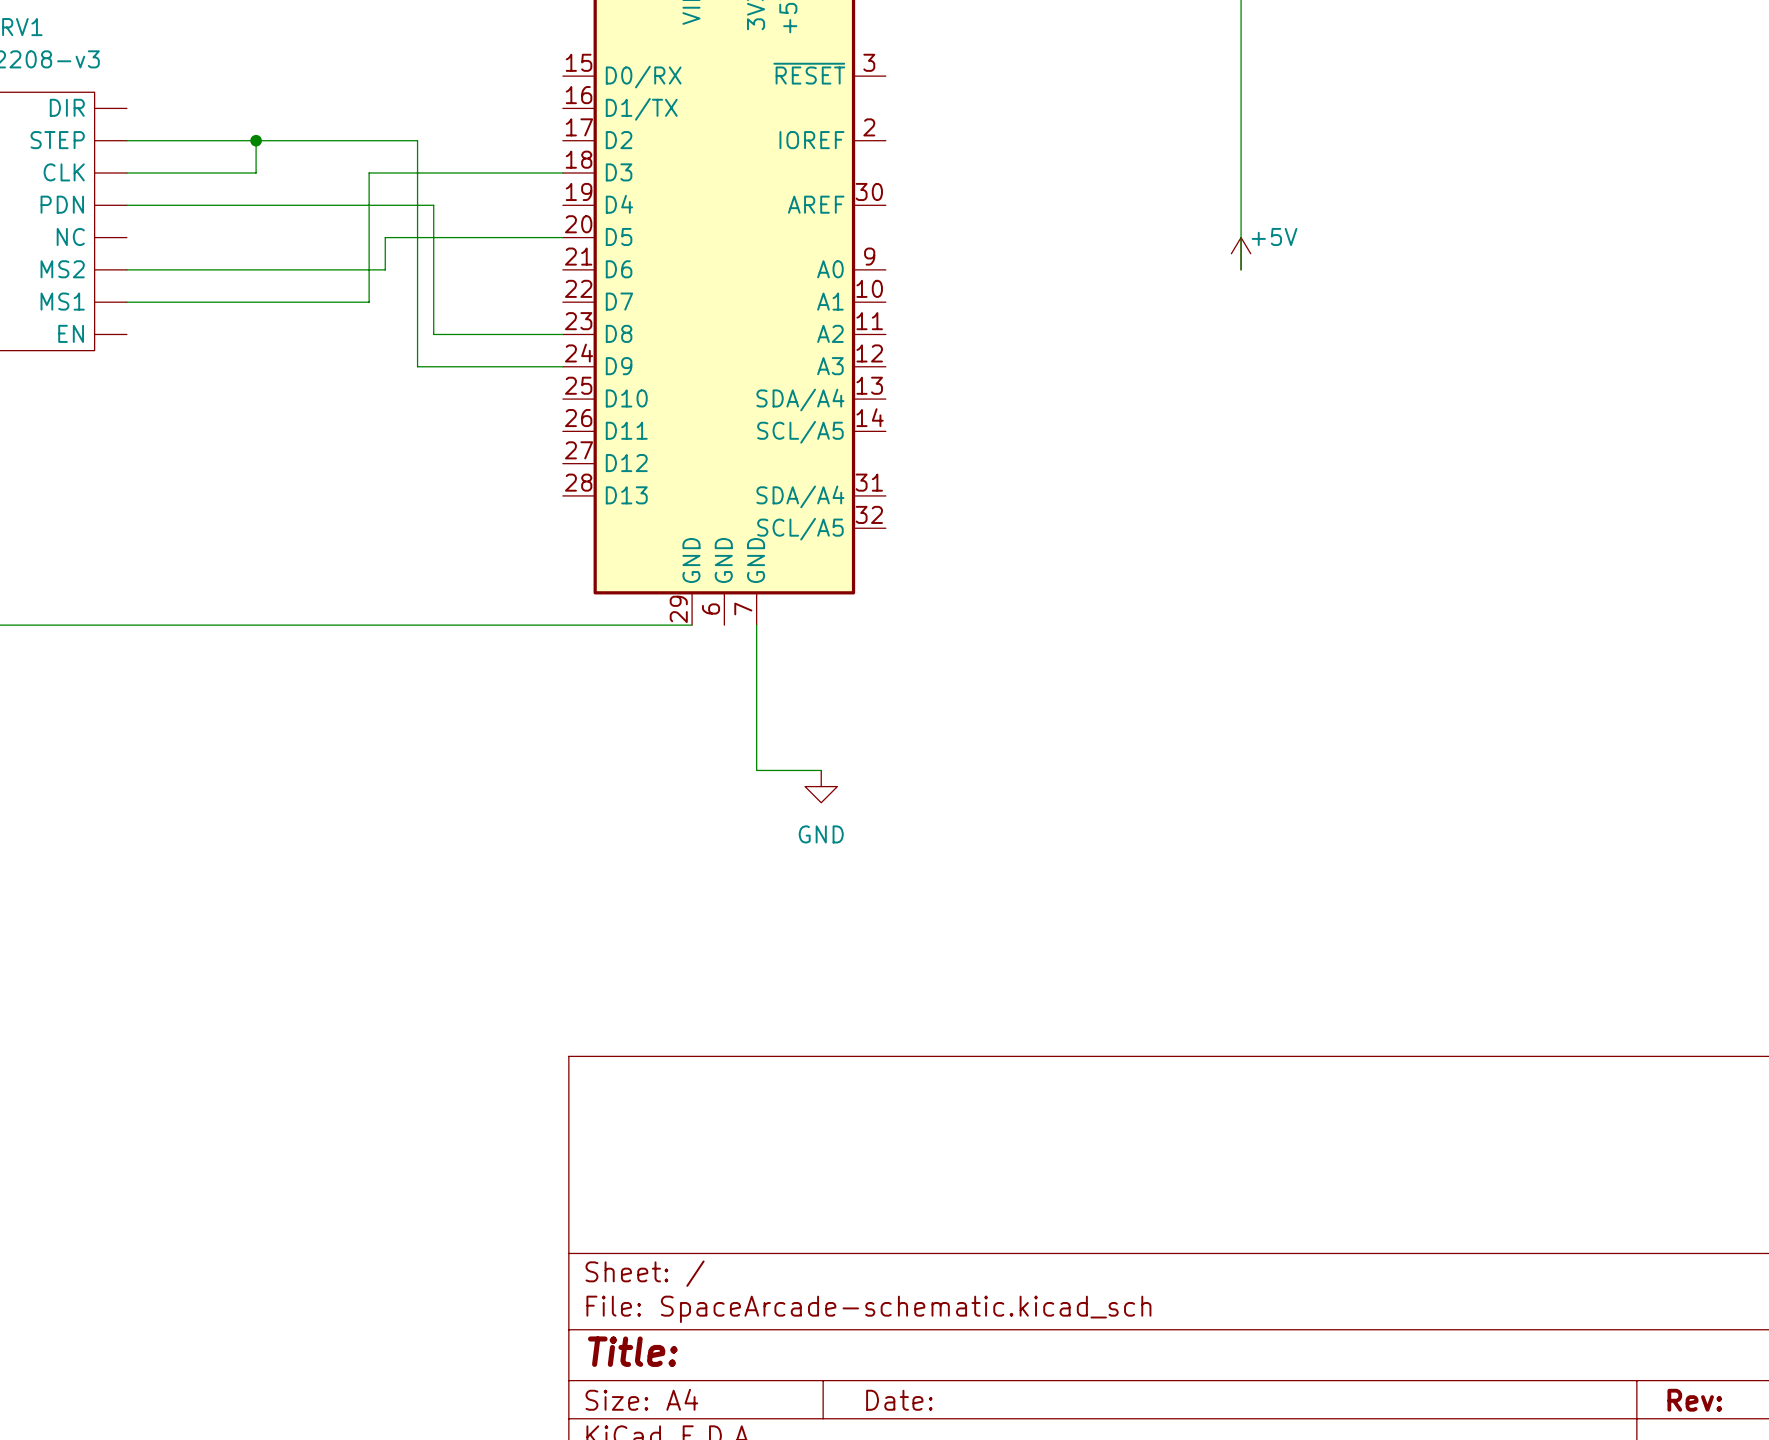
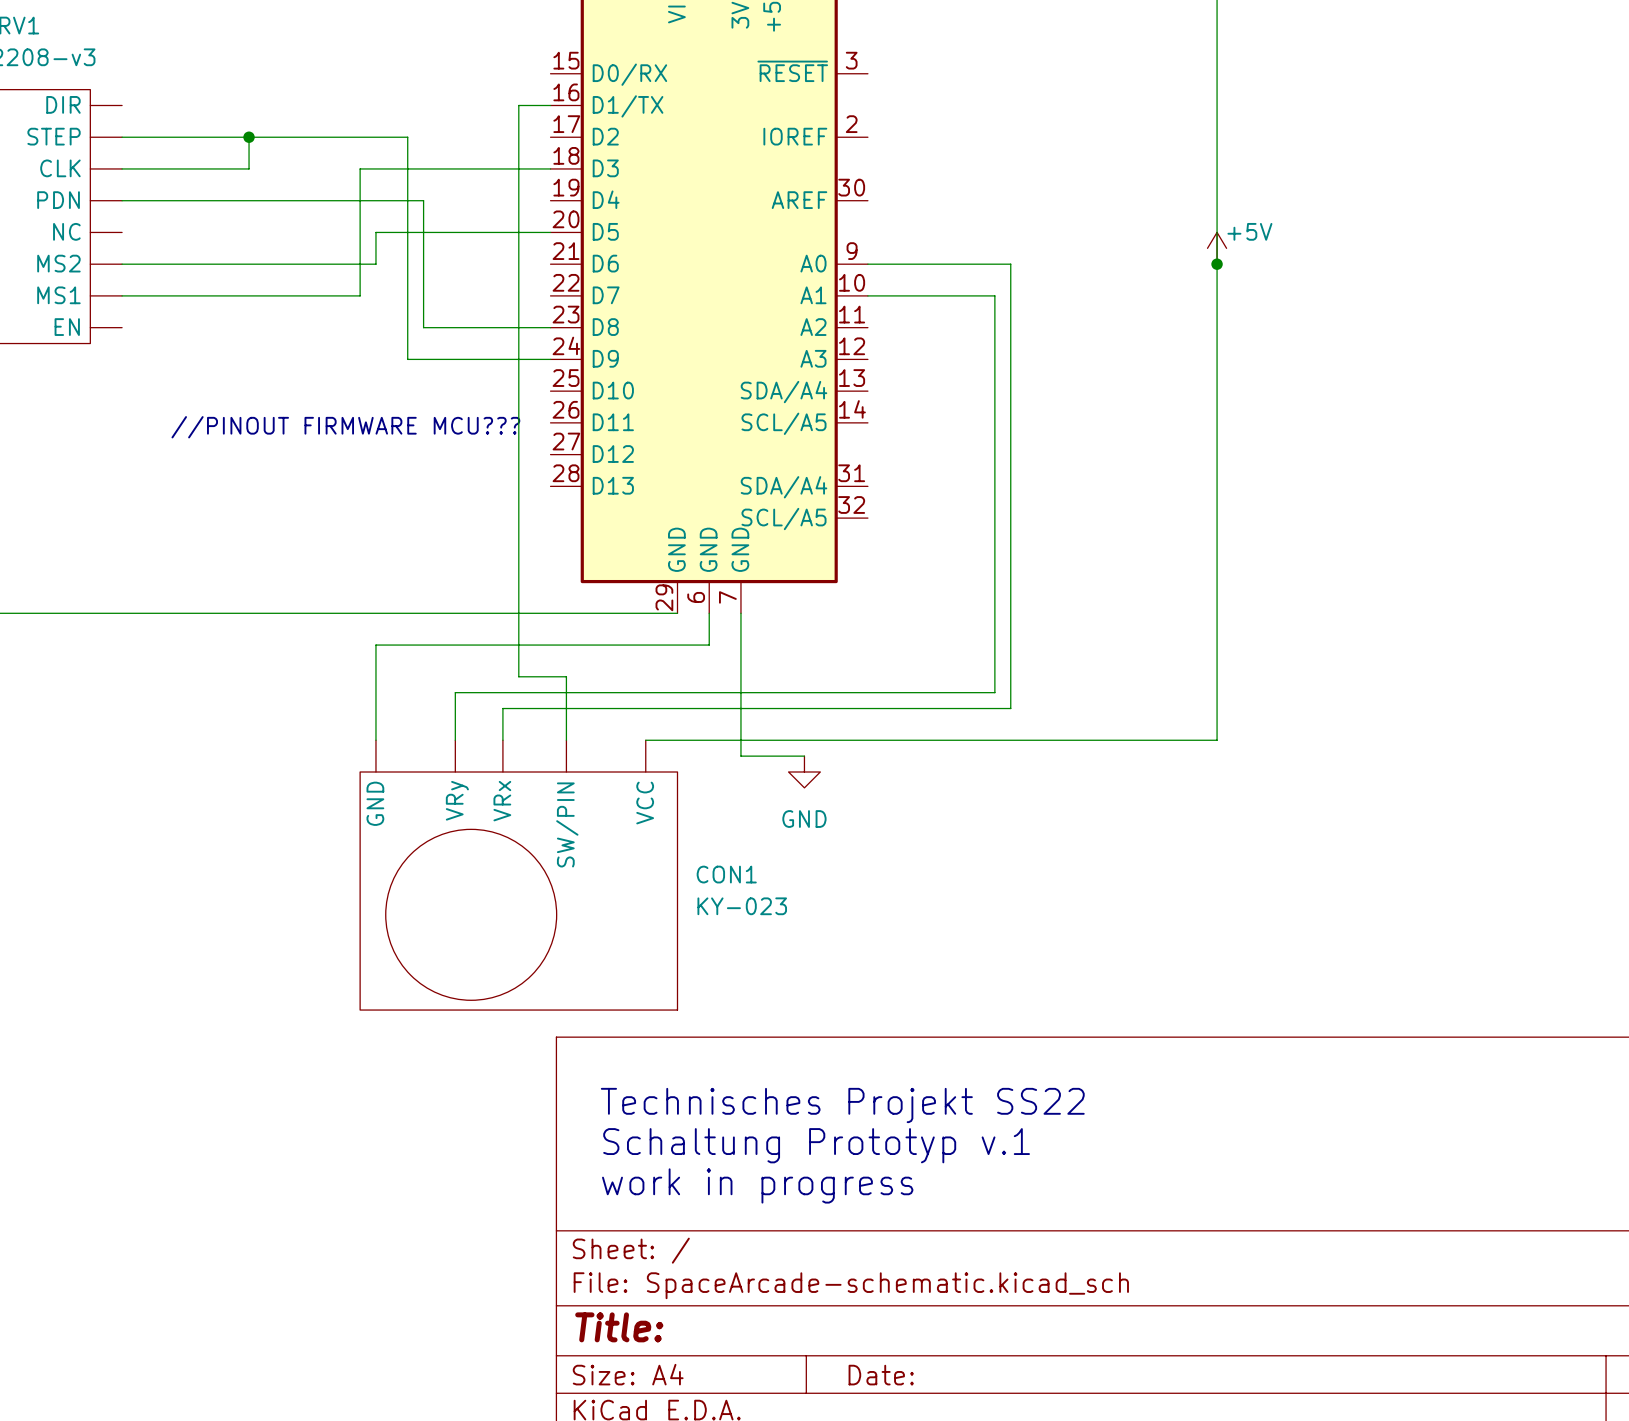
wire: none -> (550, 105) (518, 105) (518, 676) (566, 676) (566, 740)
wire: none -> (867, 264) (1010, 264) (1010, 708) (502, 708) (502, 740)
wire: none -> (1217, 264) (1217, 740) (645, 740)
junction: none -> (1217, 264)
wire: none -> (867, 295) (994, 295) (994, 692) (455, 692) (455, 740)
text: none -> //PINOUT FIRMWARE MCU??? (345, 427)
wire: none -> (709, 613) (709, 645) (375, 645) (375, 740)
CON1: none -> KY-023 (518, 875)
text: none -> Technisches Projekt SS22 (842, 1105)
text: none -> Schaltung Prototyp v.1 (816, 1145)
text: none -> work in progress (757, 1185)

